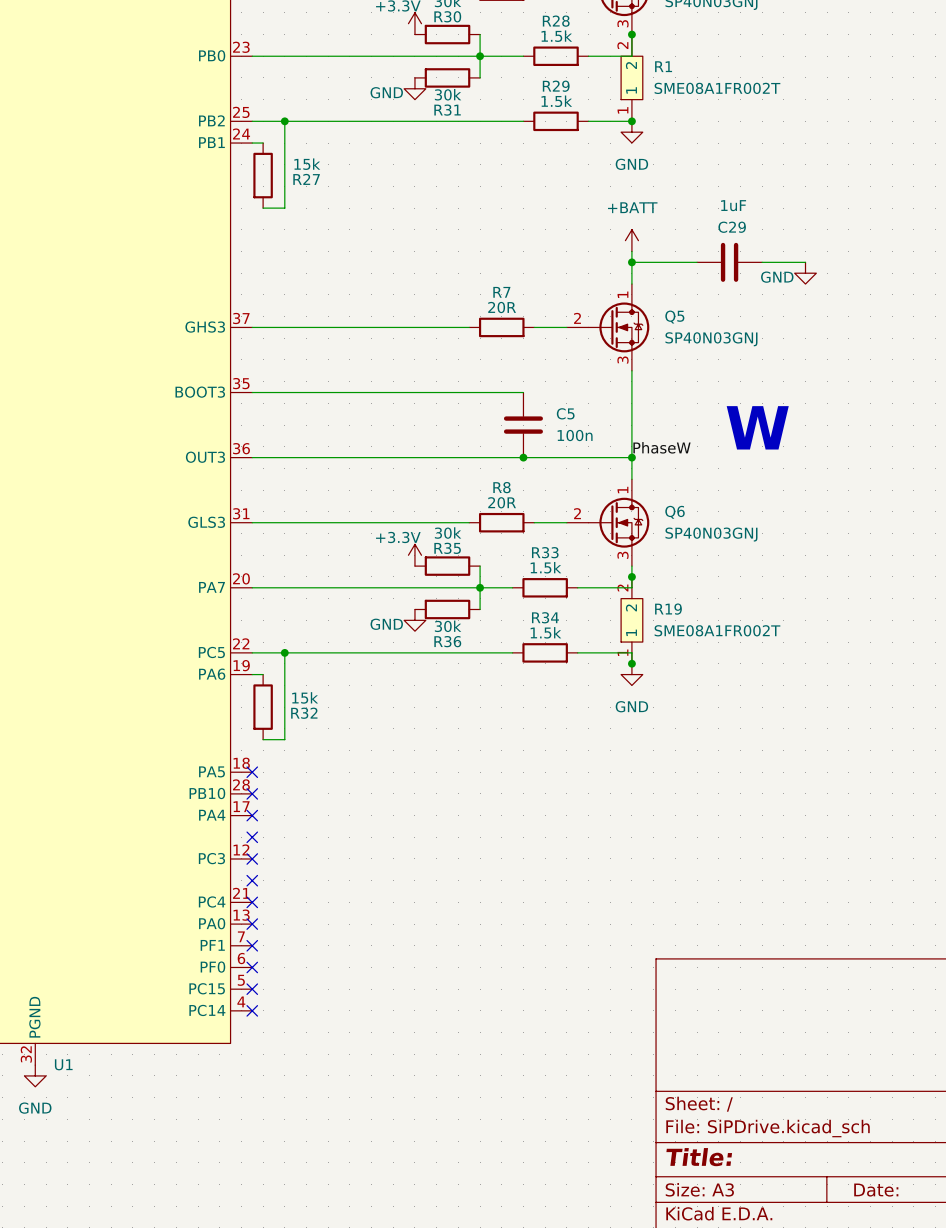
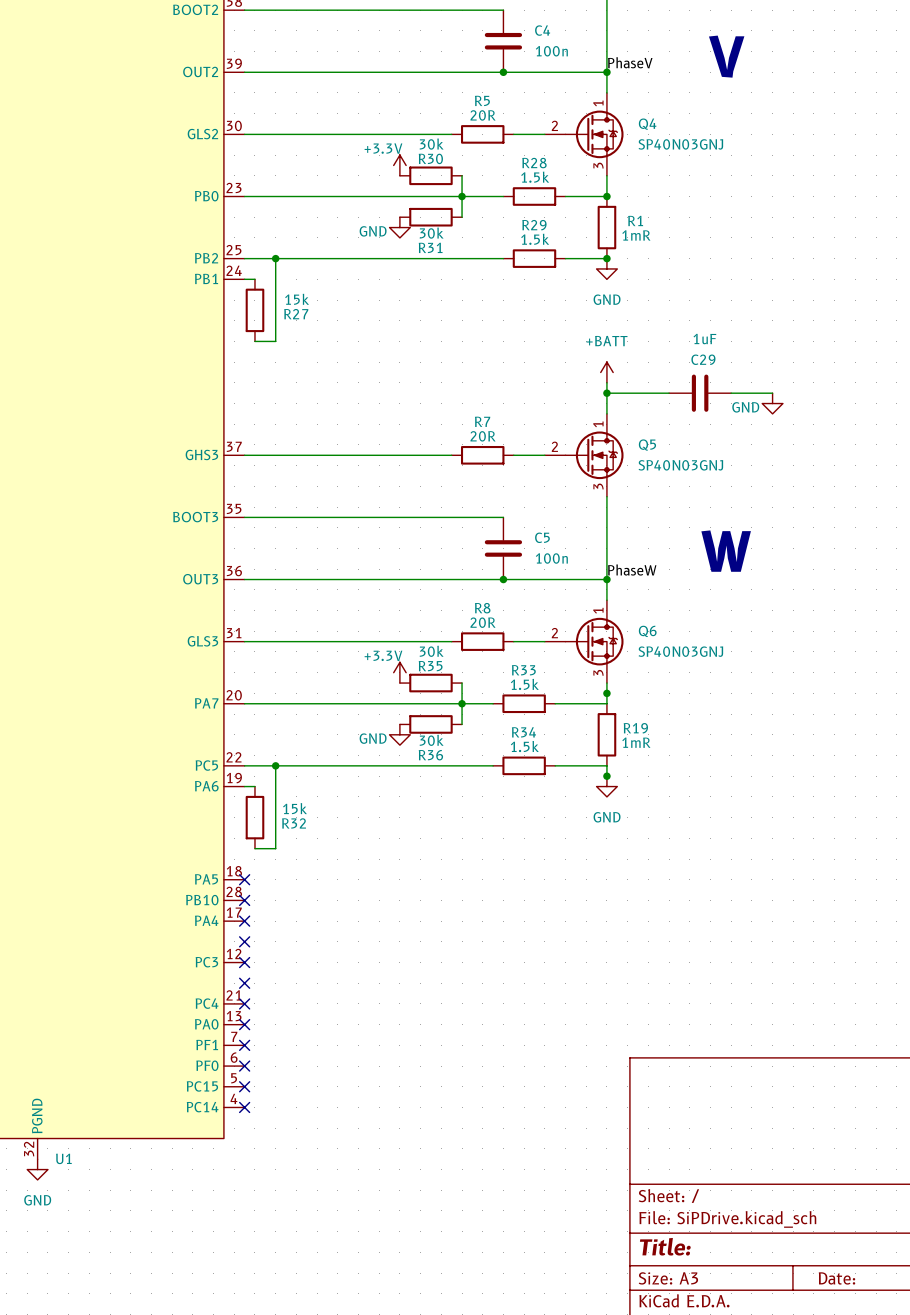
R1 symbol: [621, 34, 643, 122] -> [597, 196, 617, 259]
junction position: (631, 34) -> (606, 196)
R1 value: SME08A1FR002T (717, 88) -> 1mR (636, 235)
R19 symbol: [621, 576, 643, 664] -> [597, 703, 617, 766]
R19 value: SME08A1FR002T (717, 630) -> 1mR (636, 742)

